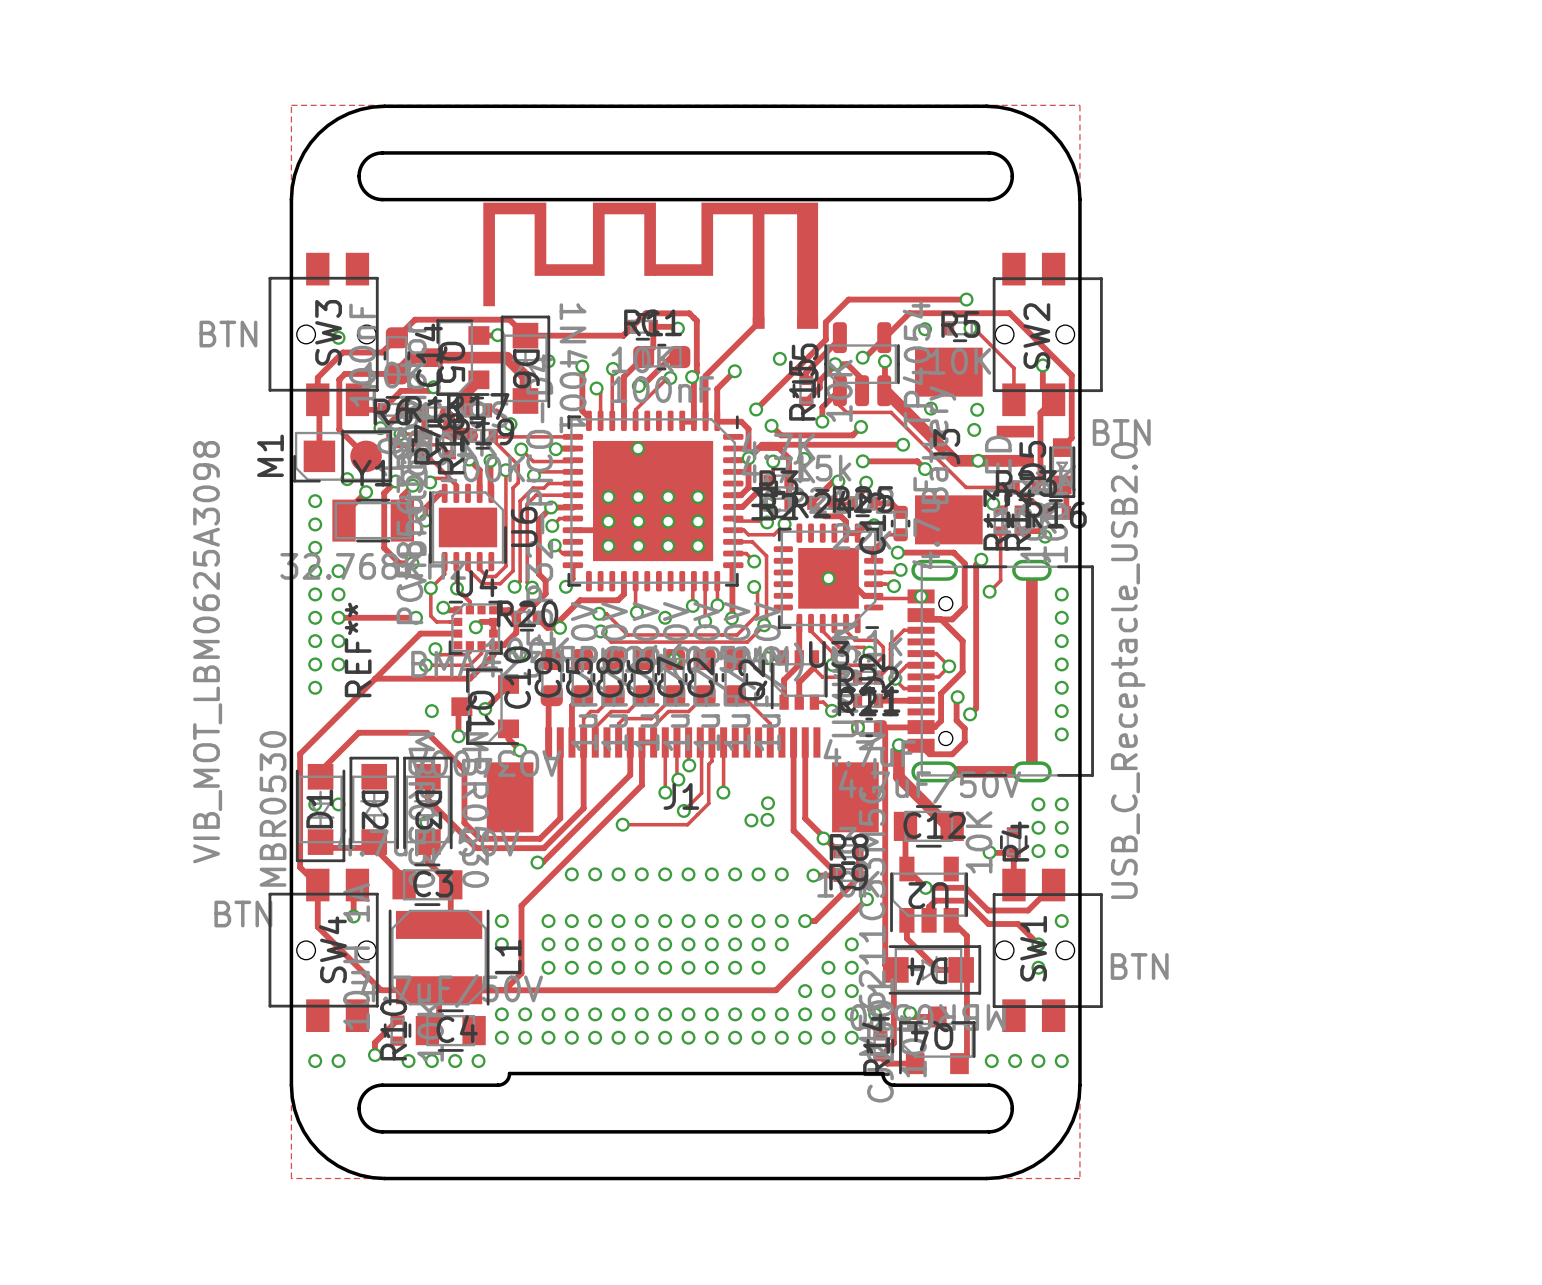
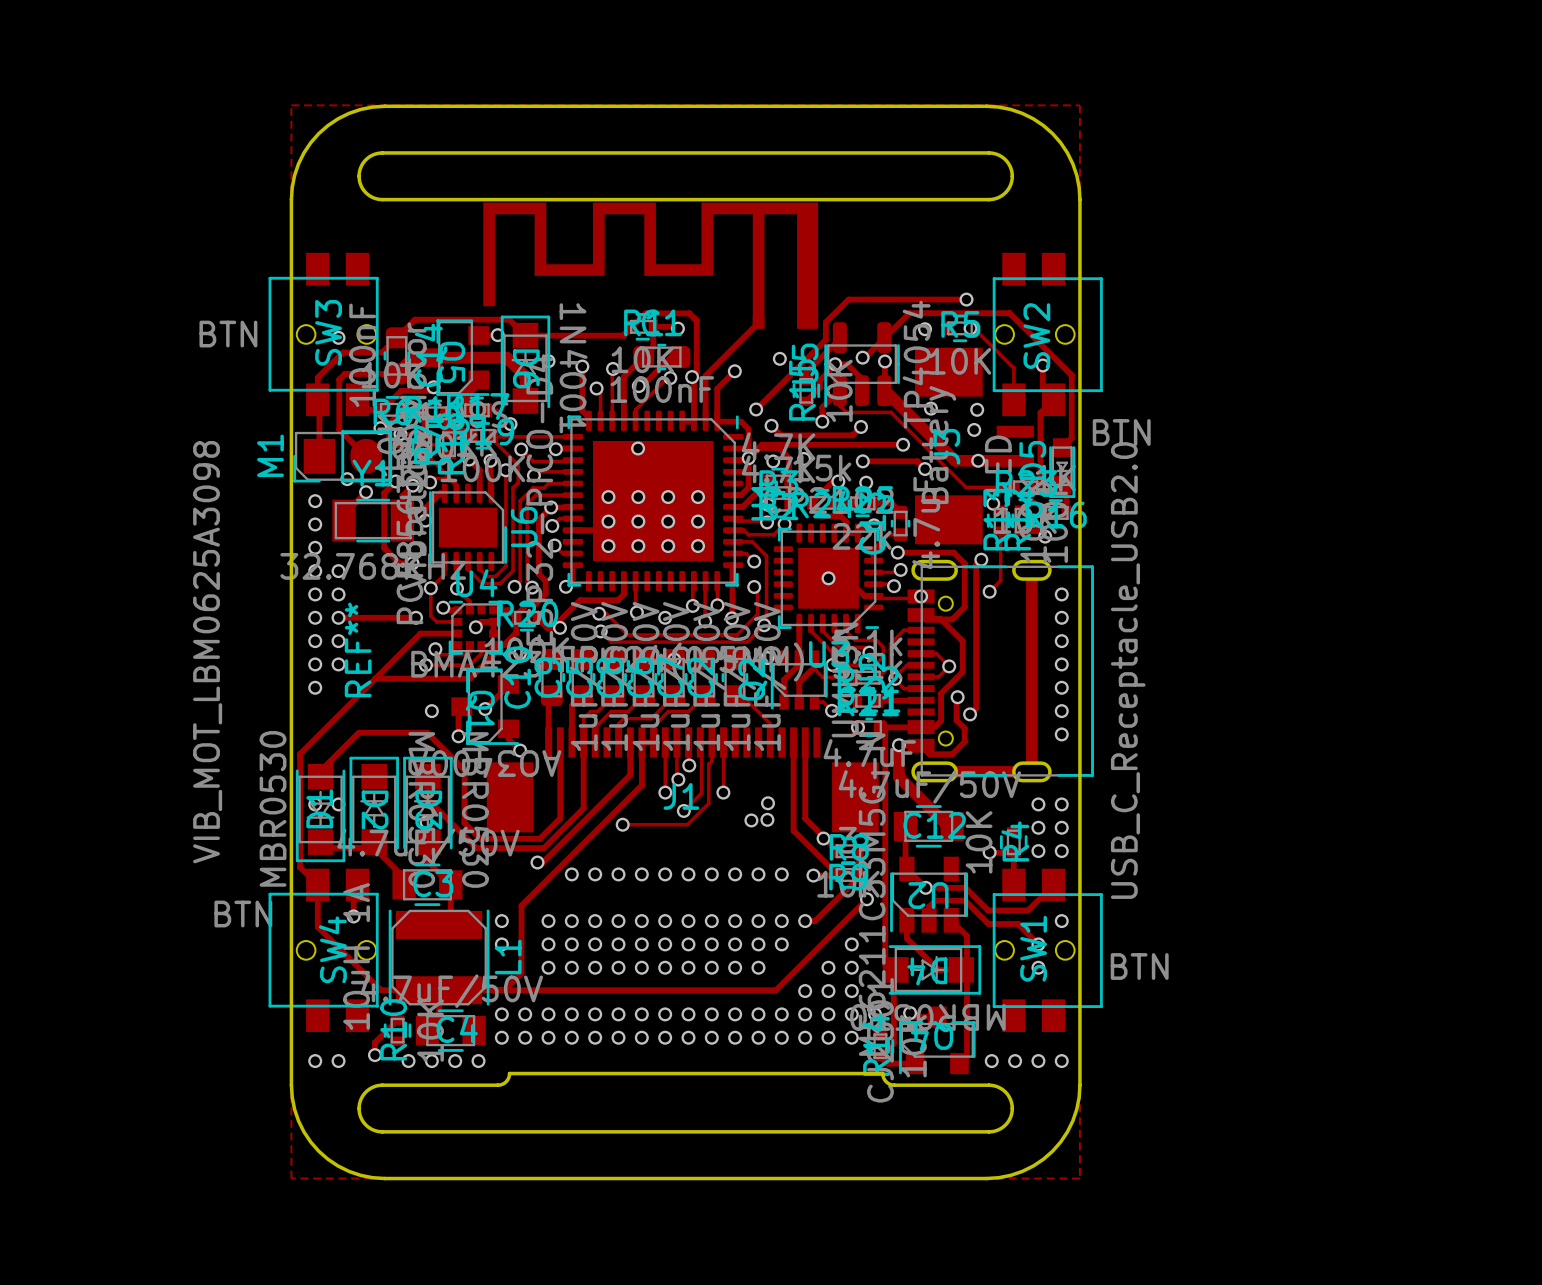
M1 footprint: [293, 430, 393, 483] -> [293, 430, 393, 483]

